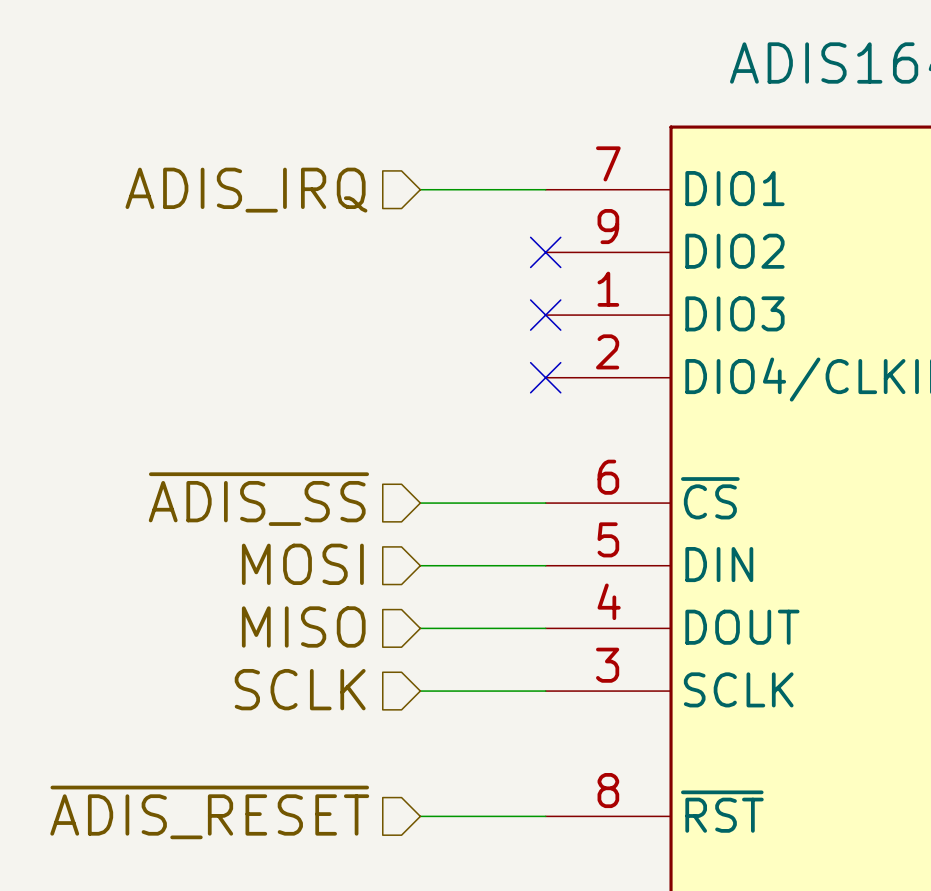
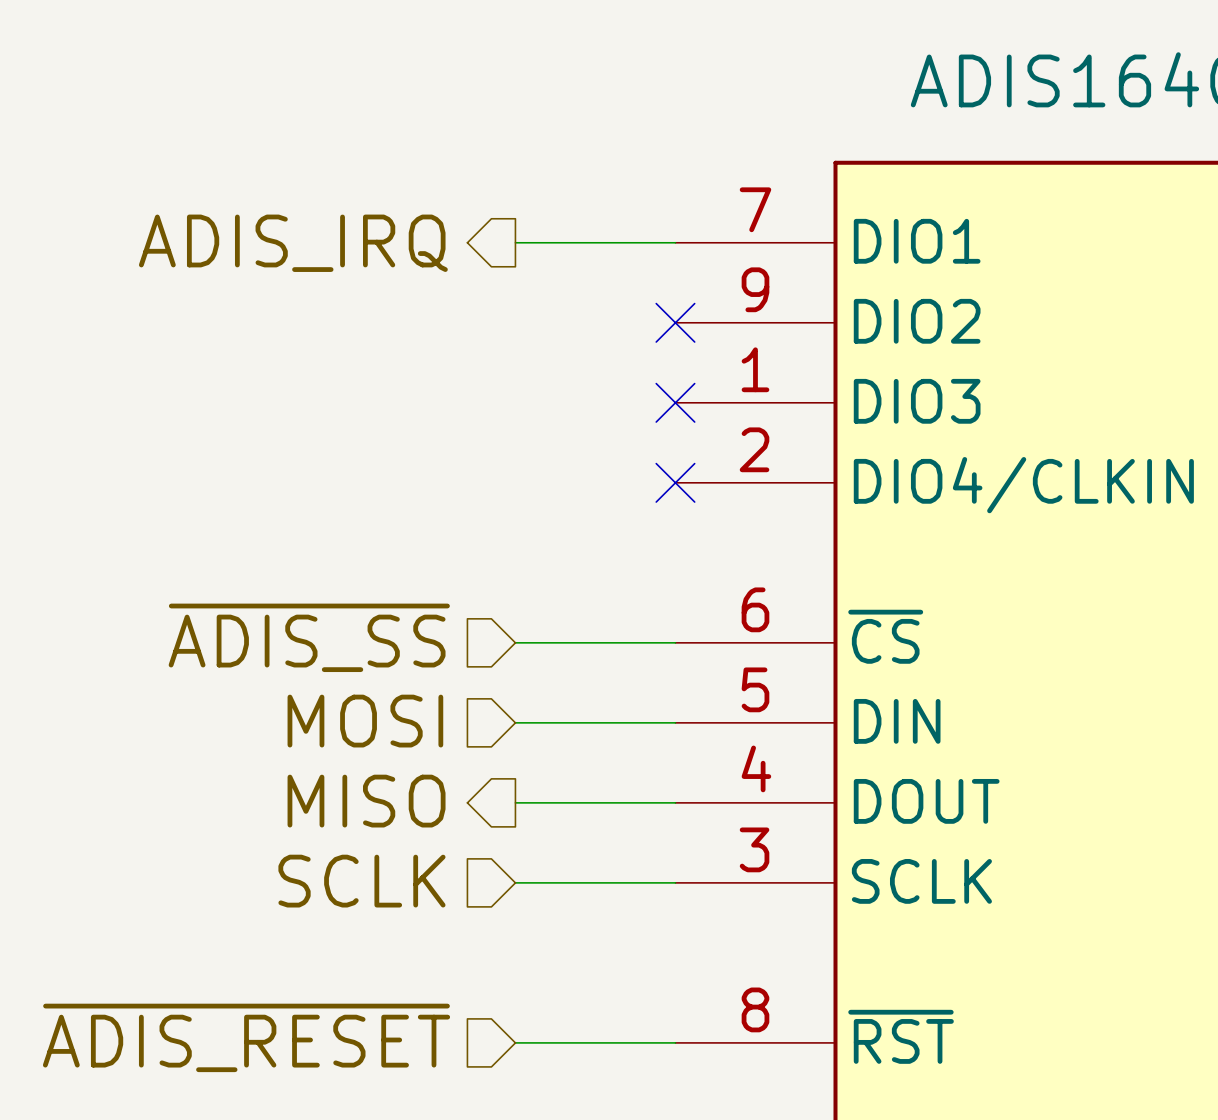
hierarchical label shape: input (246, 190) -> output (293, 243)
hierarchical label shape: input (303, 626) -> output (366, 801)

